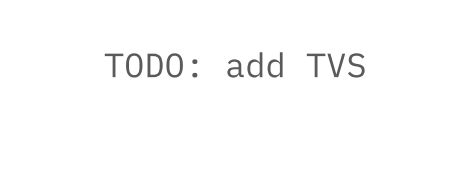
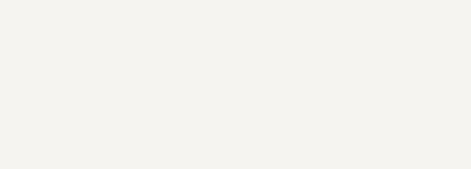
text: TODO: add TVS (234, 64) -> none

